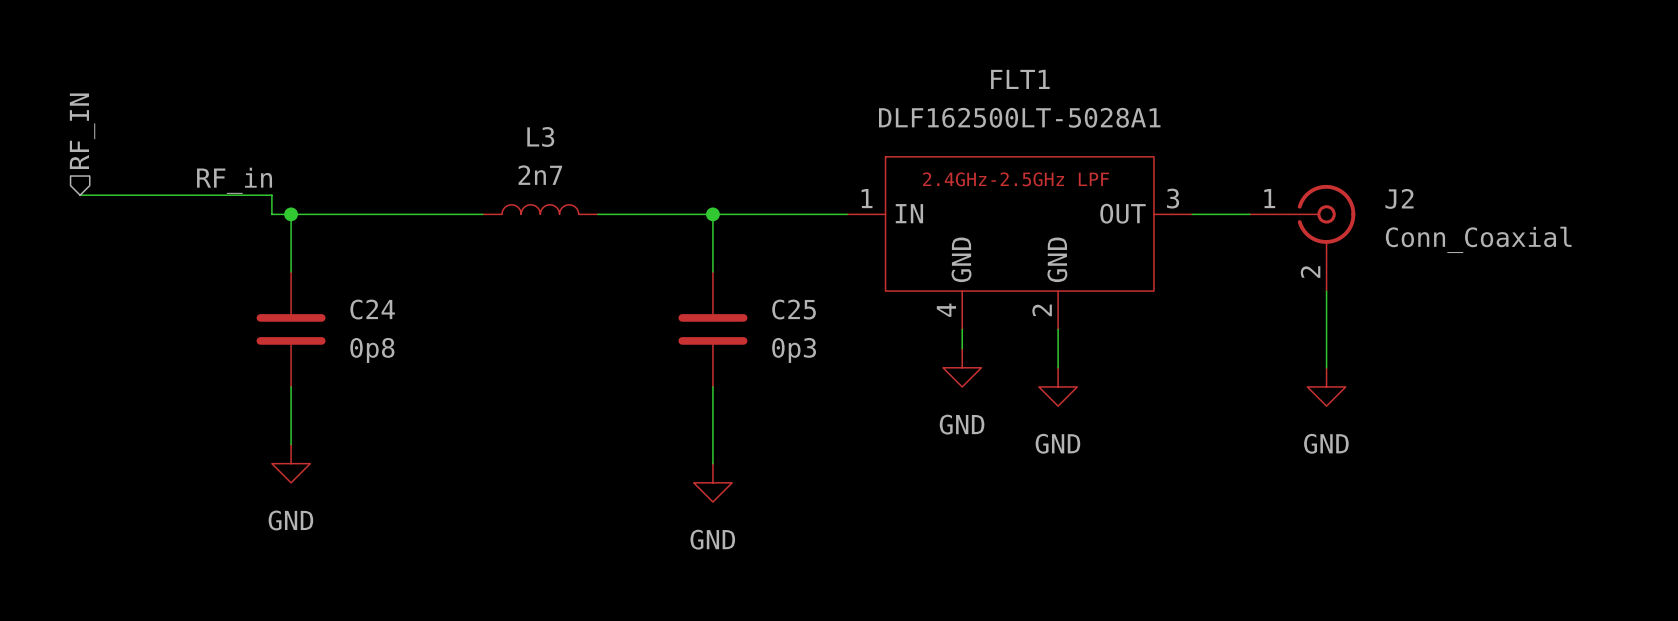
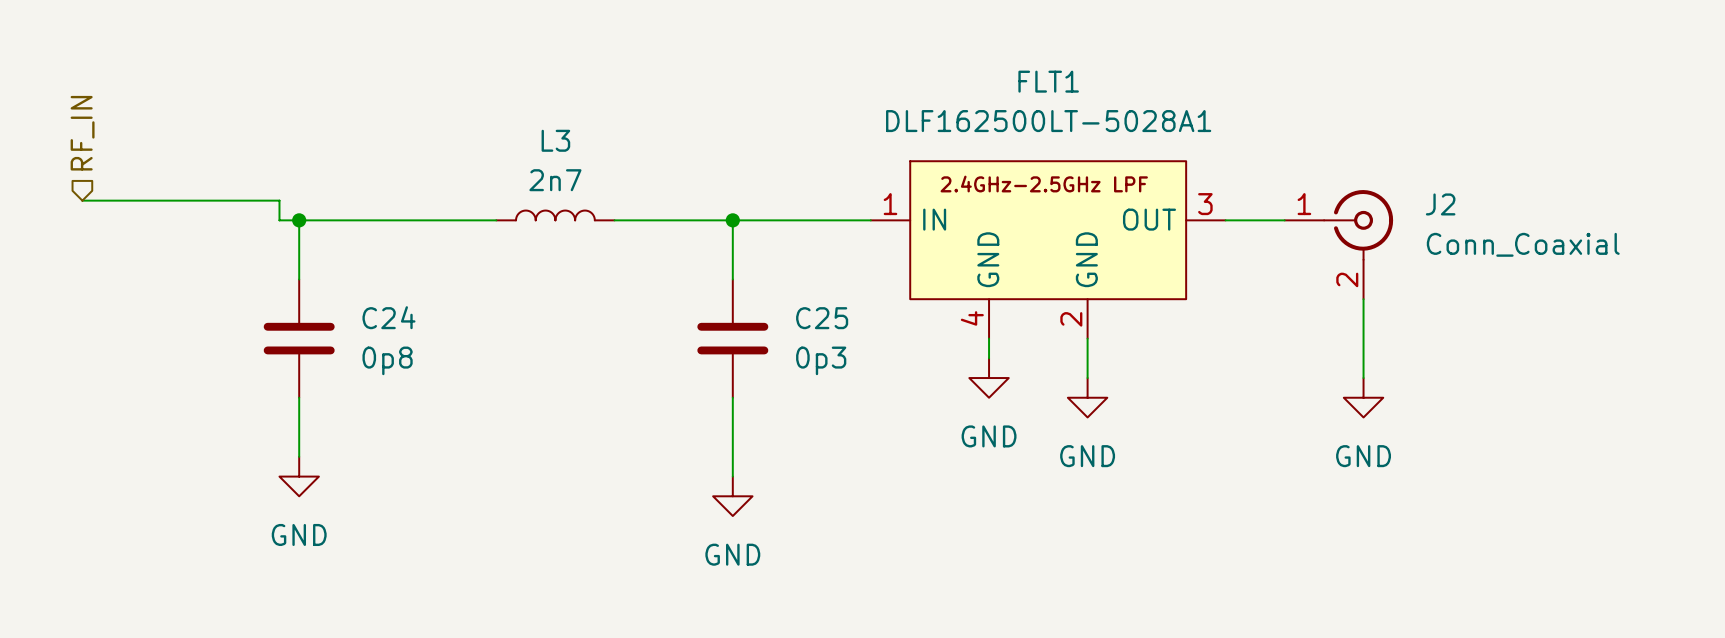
label: RF_in (234, 180) -> none

